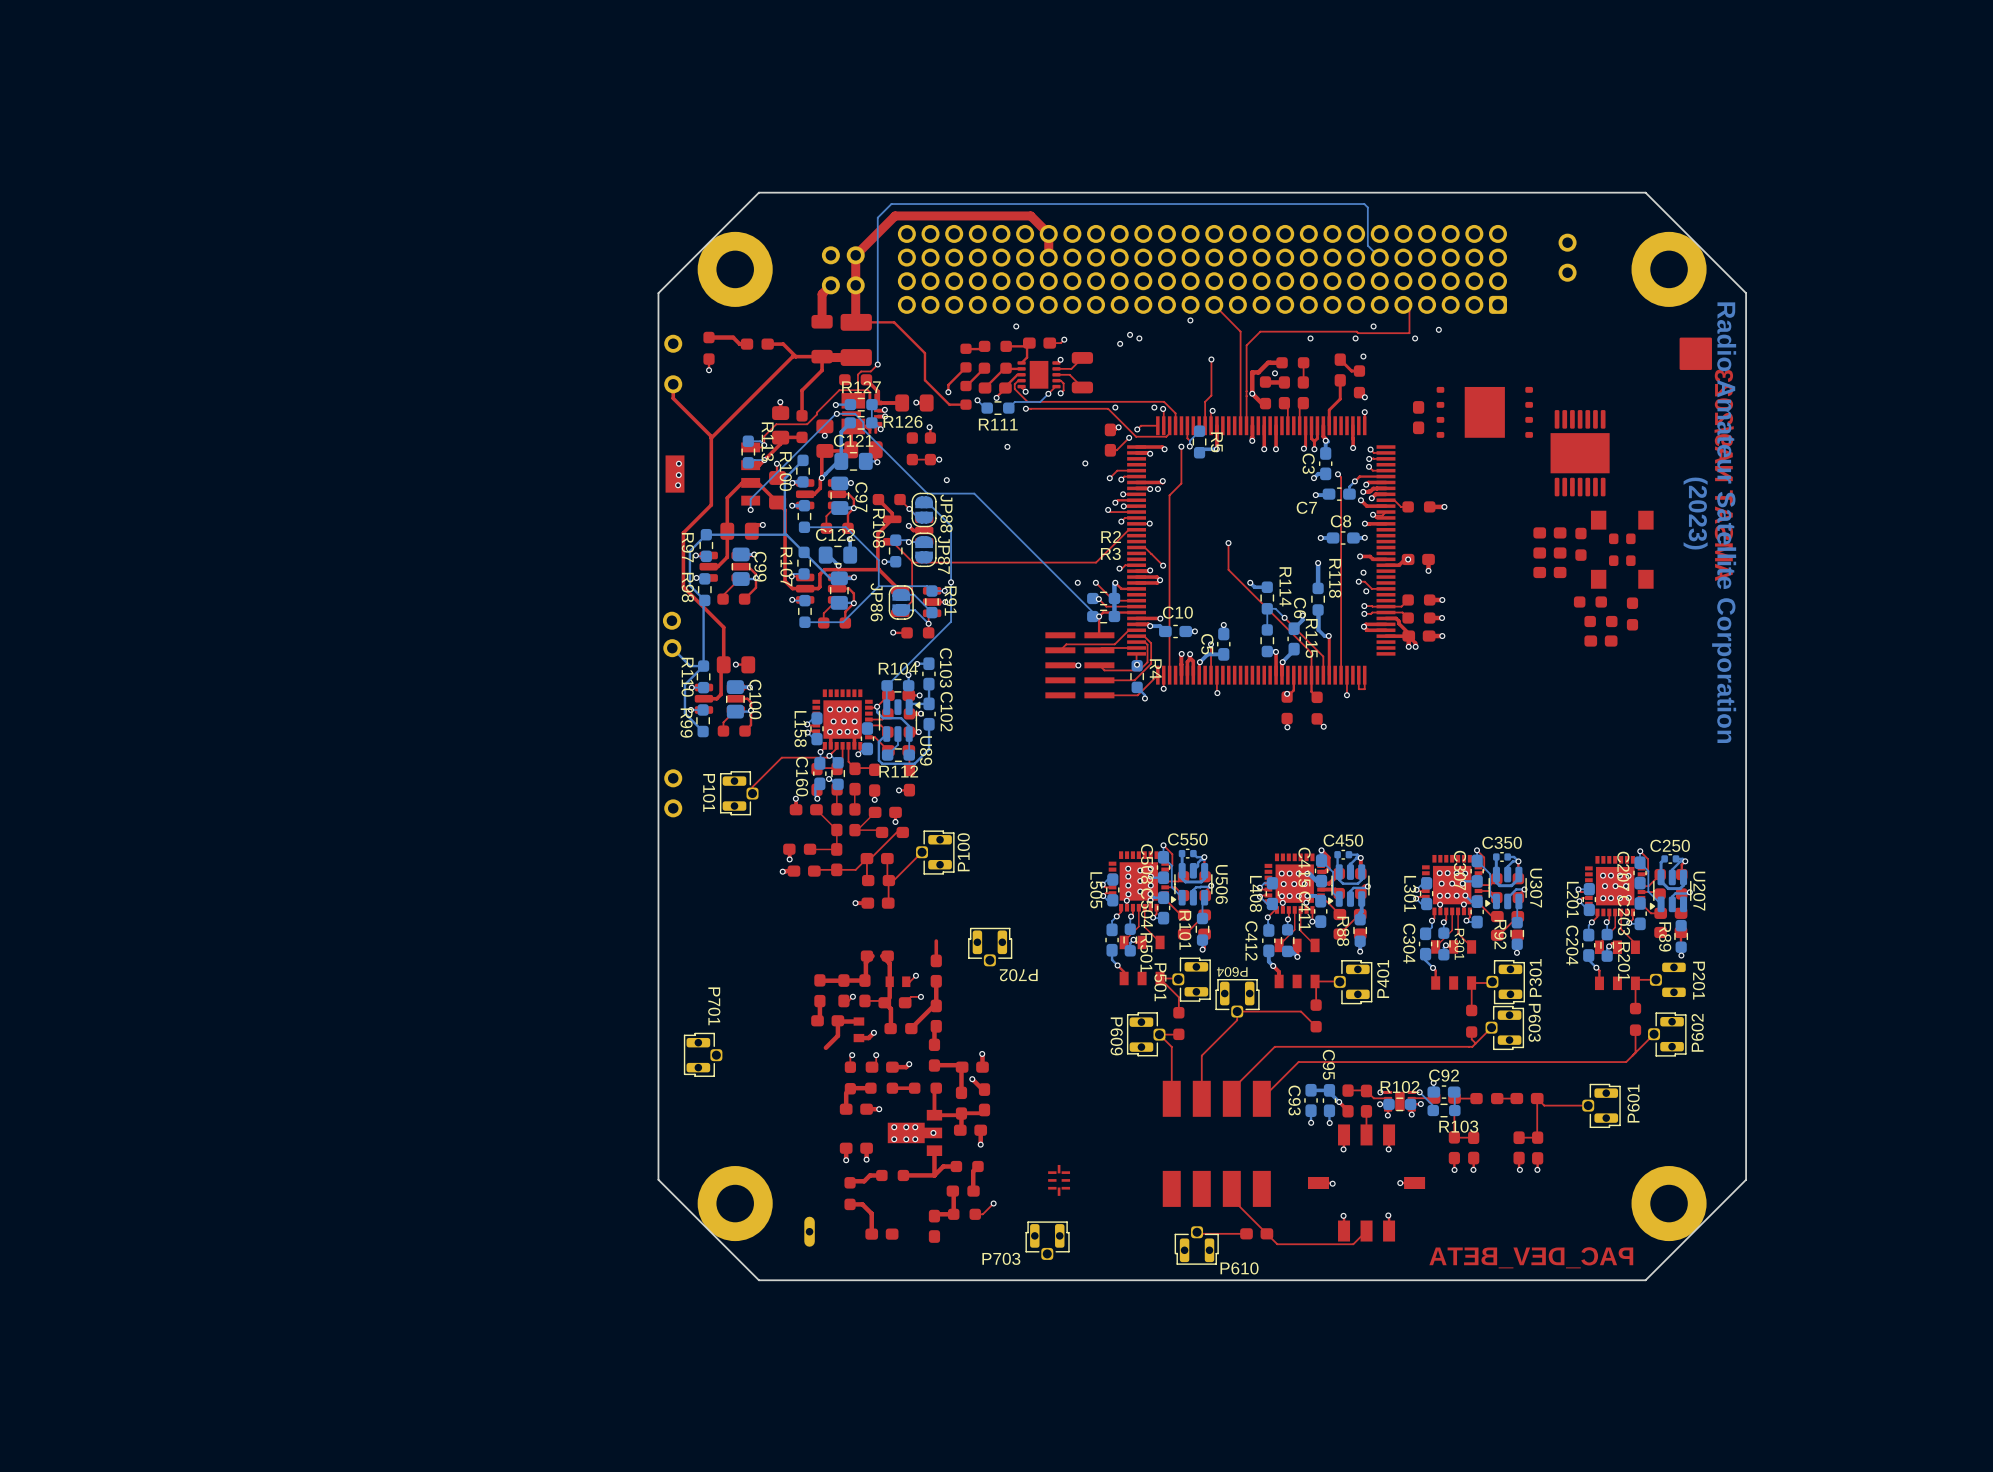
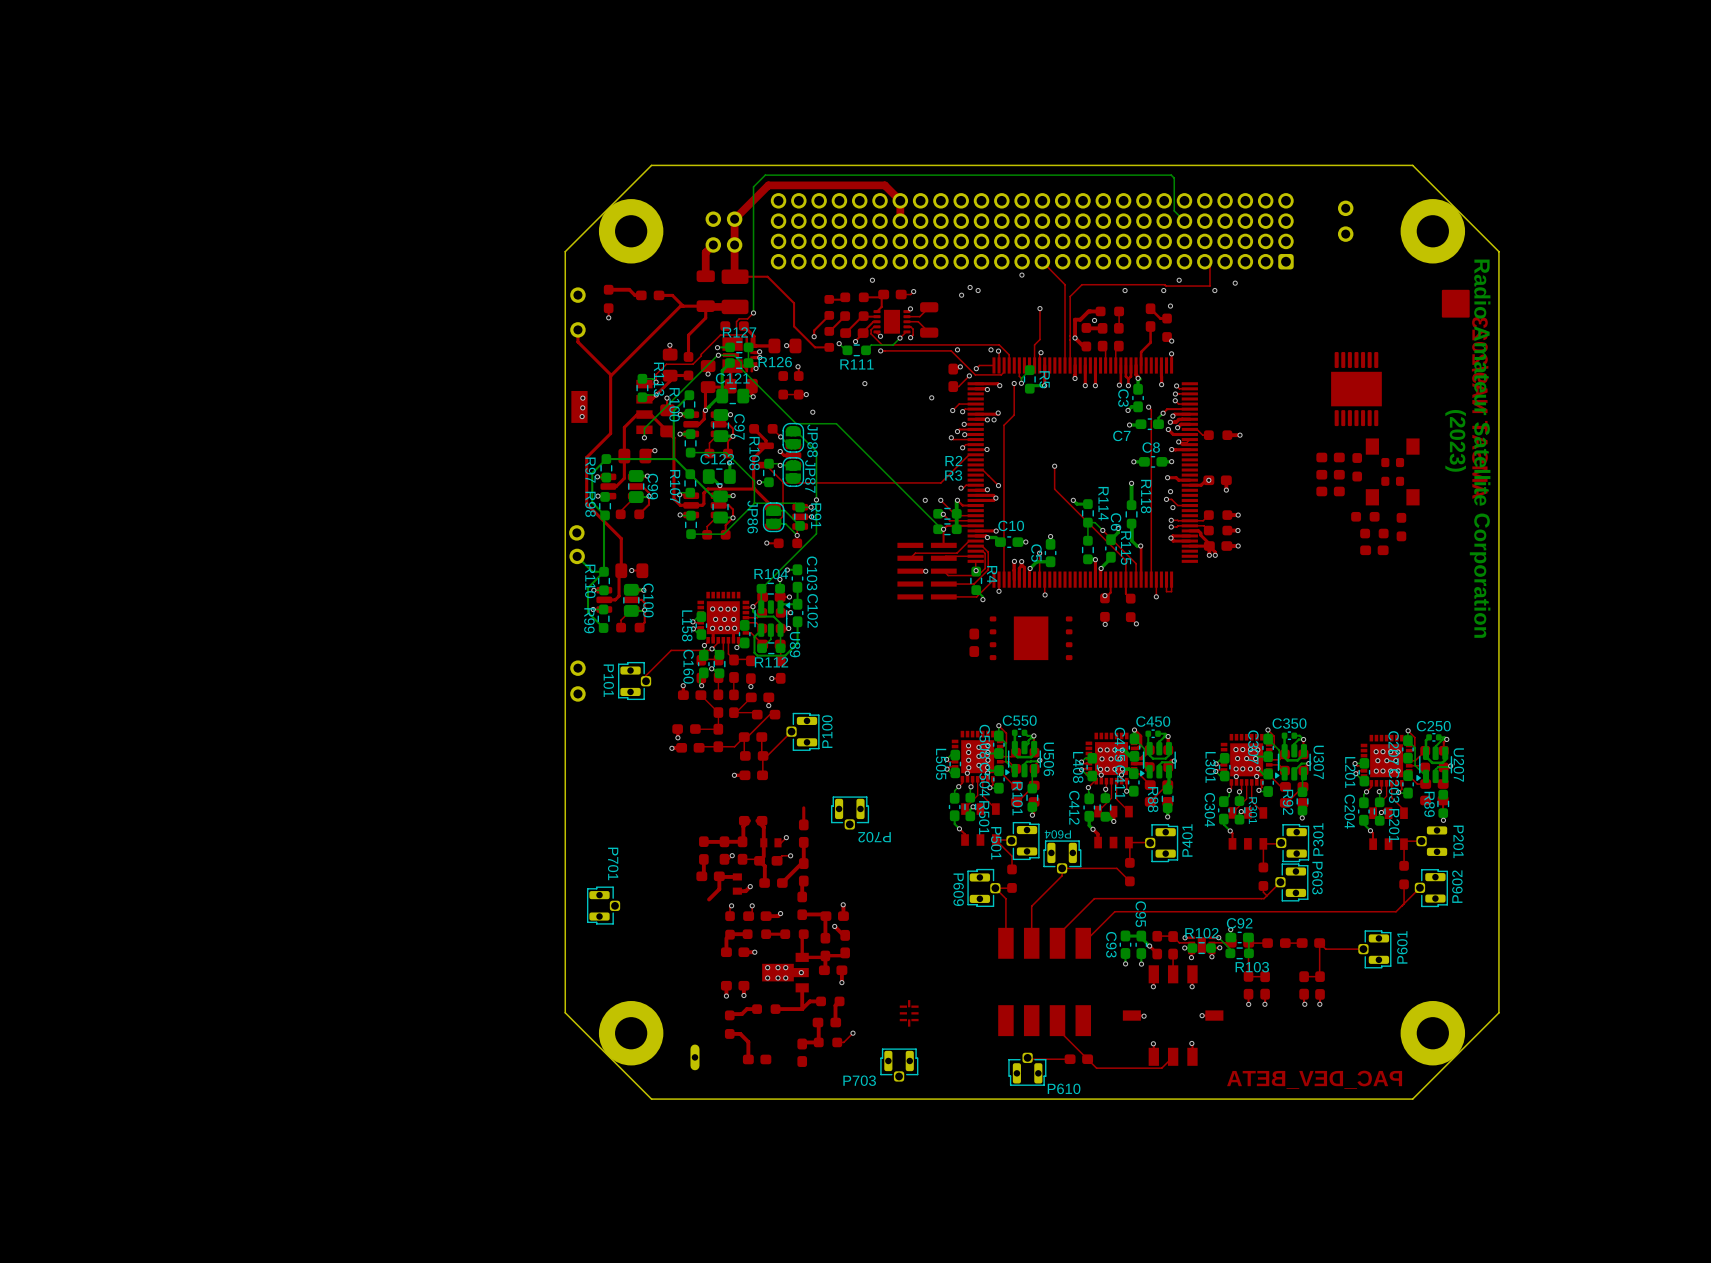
part: (1484, 412) -> none
part: (1418, 417) -> none
part: none -> (1031, 638)
part: none -> (974, 642)

